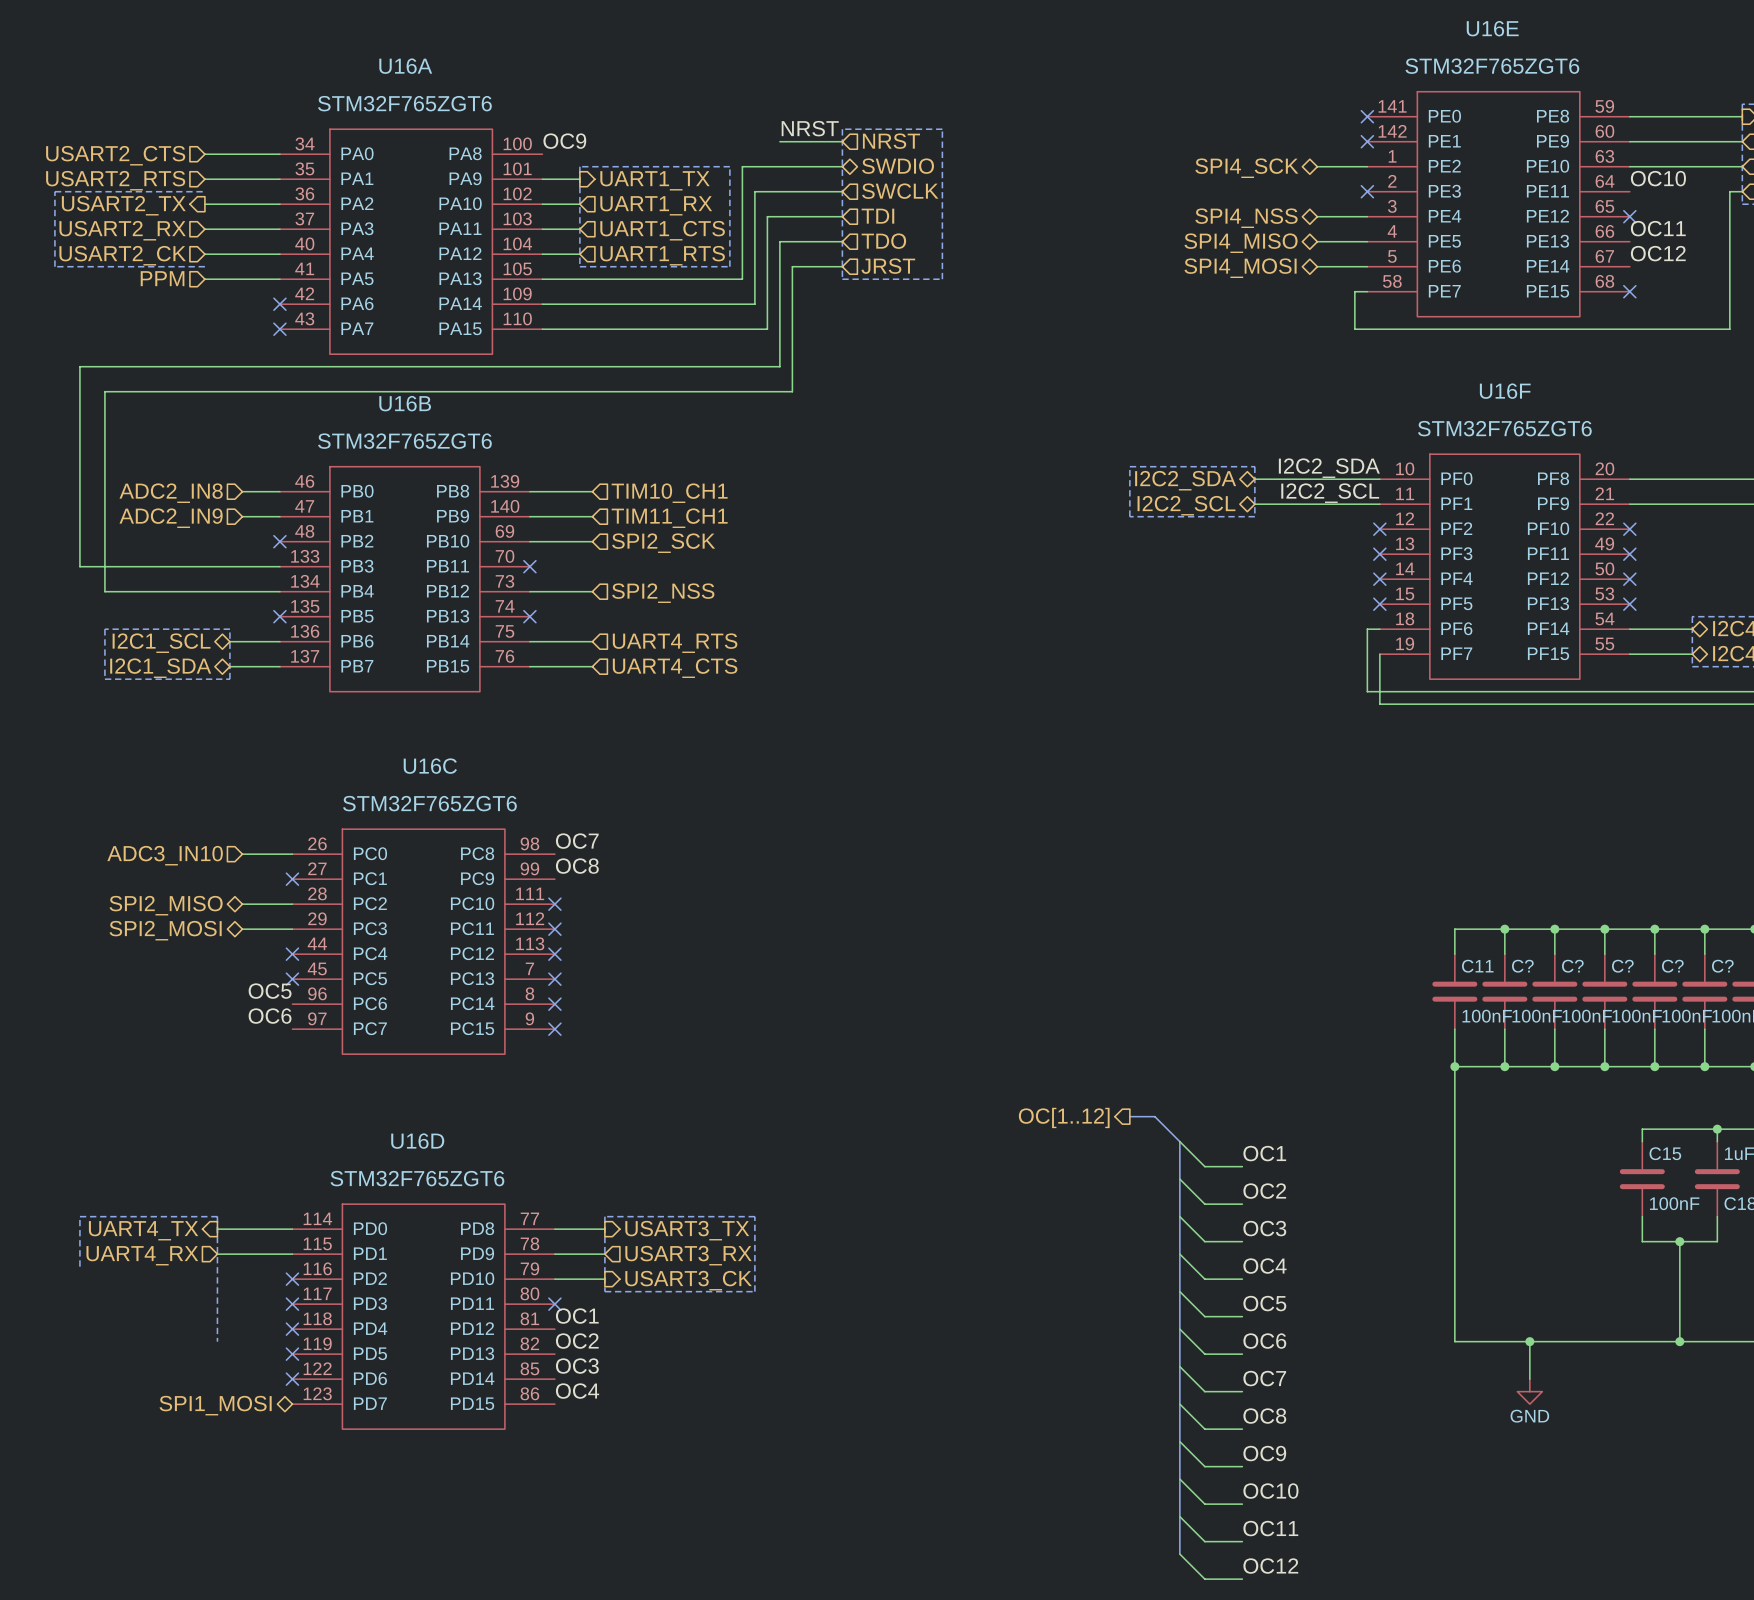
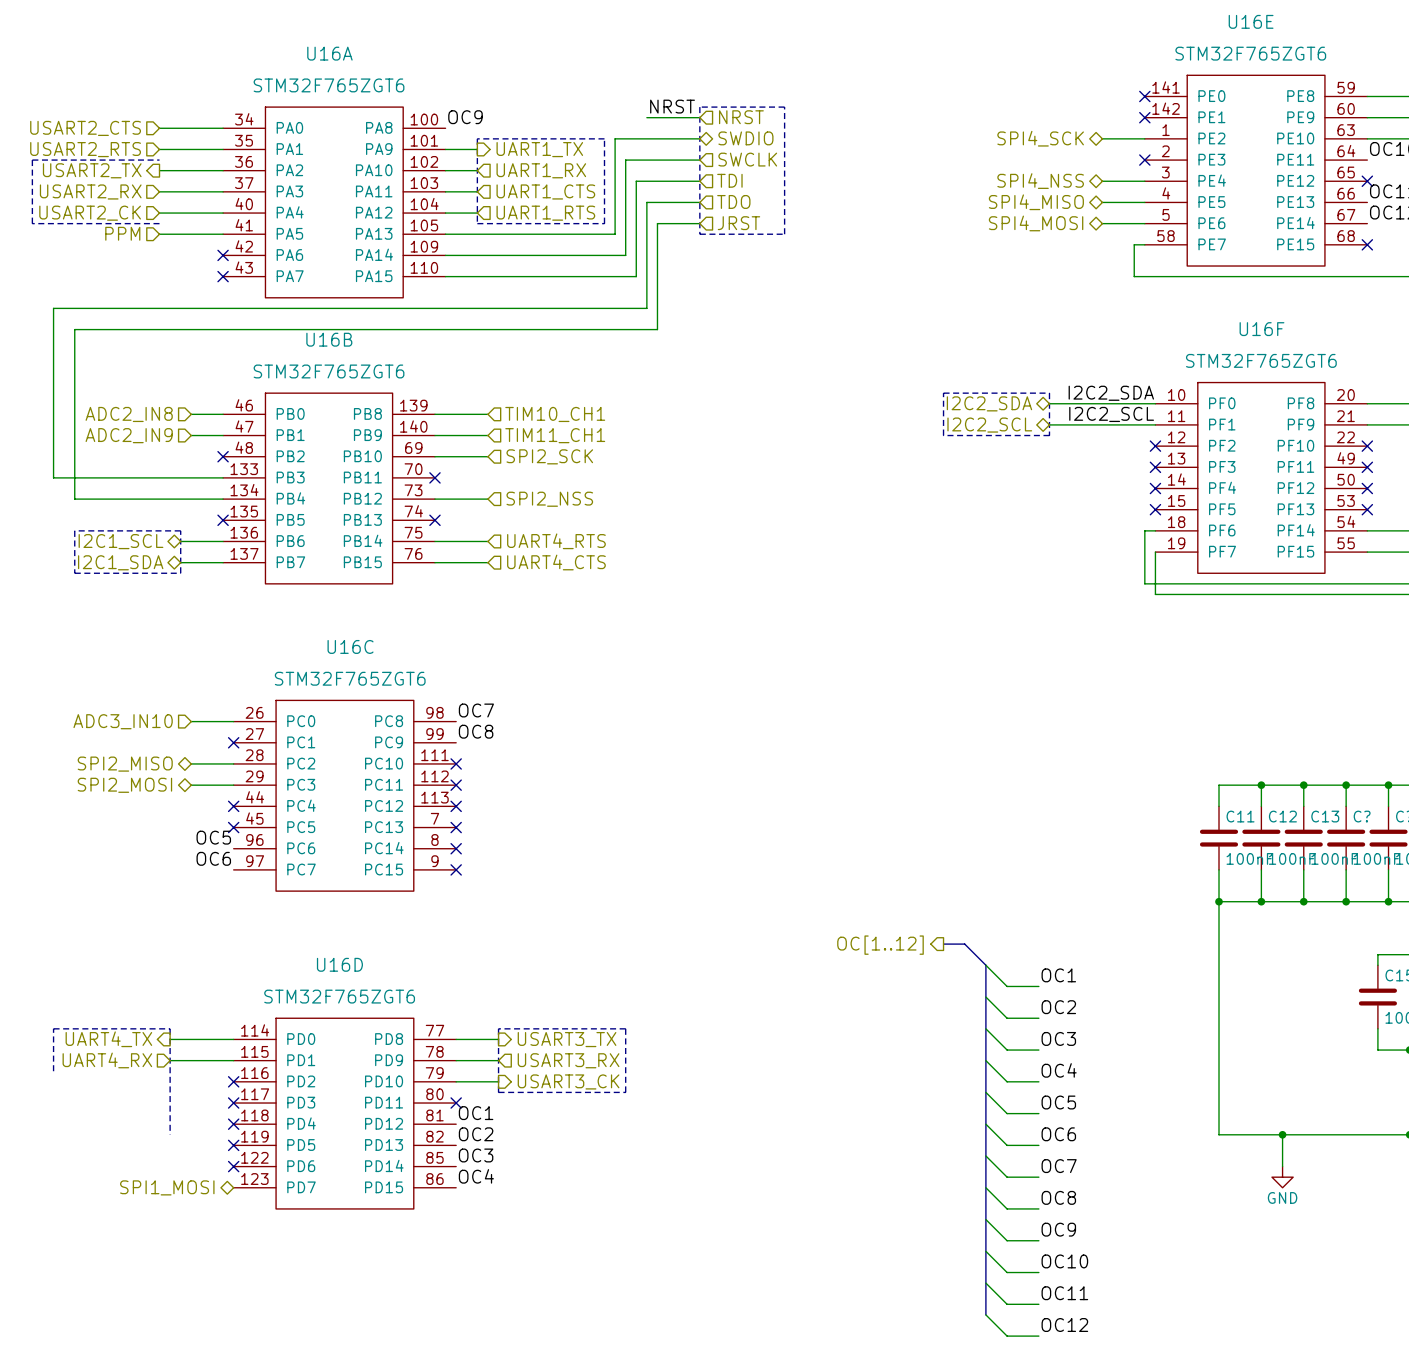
C? name: C? (1522, 966) -> C12 (1282, 816)
C? name: C? (1572, 966) -> C13 (1325, 816)

